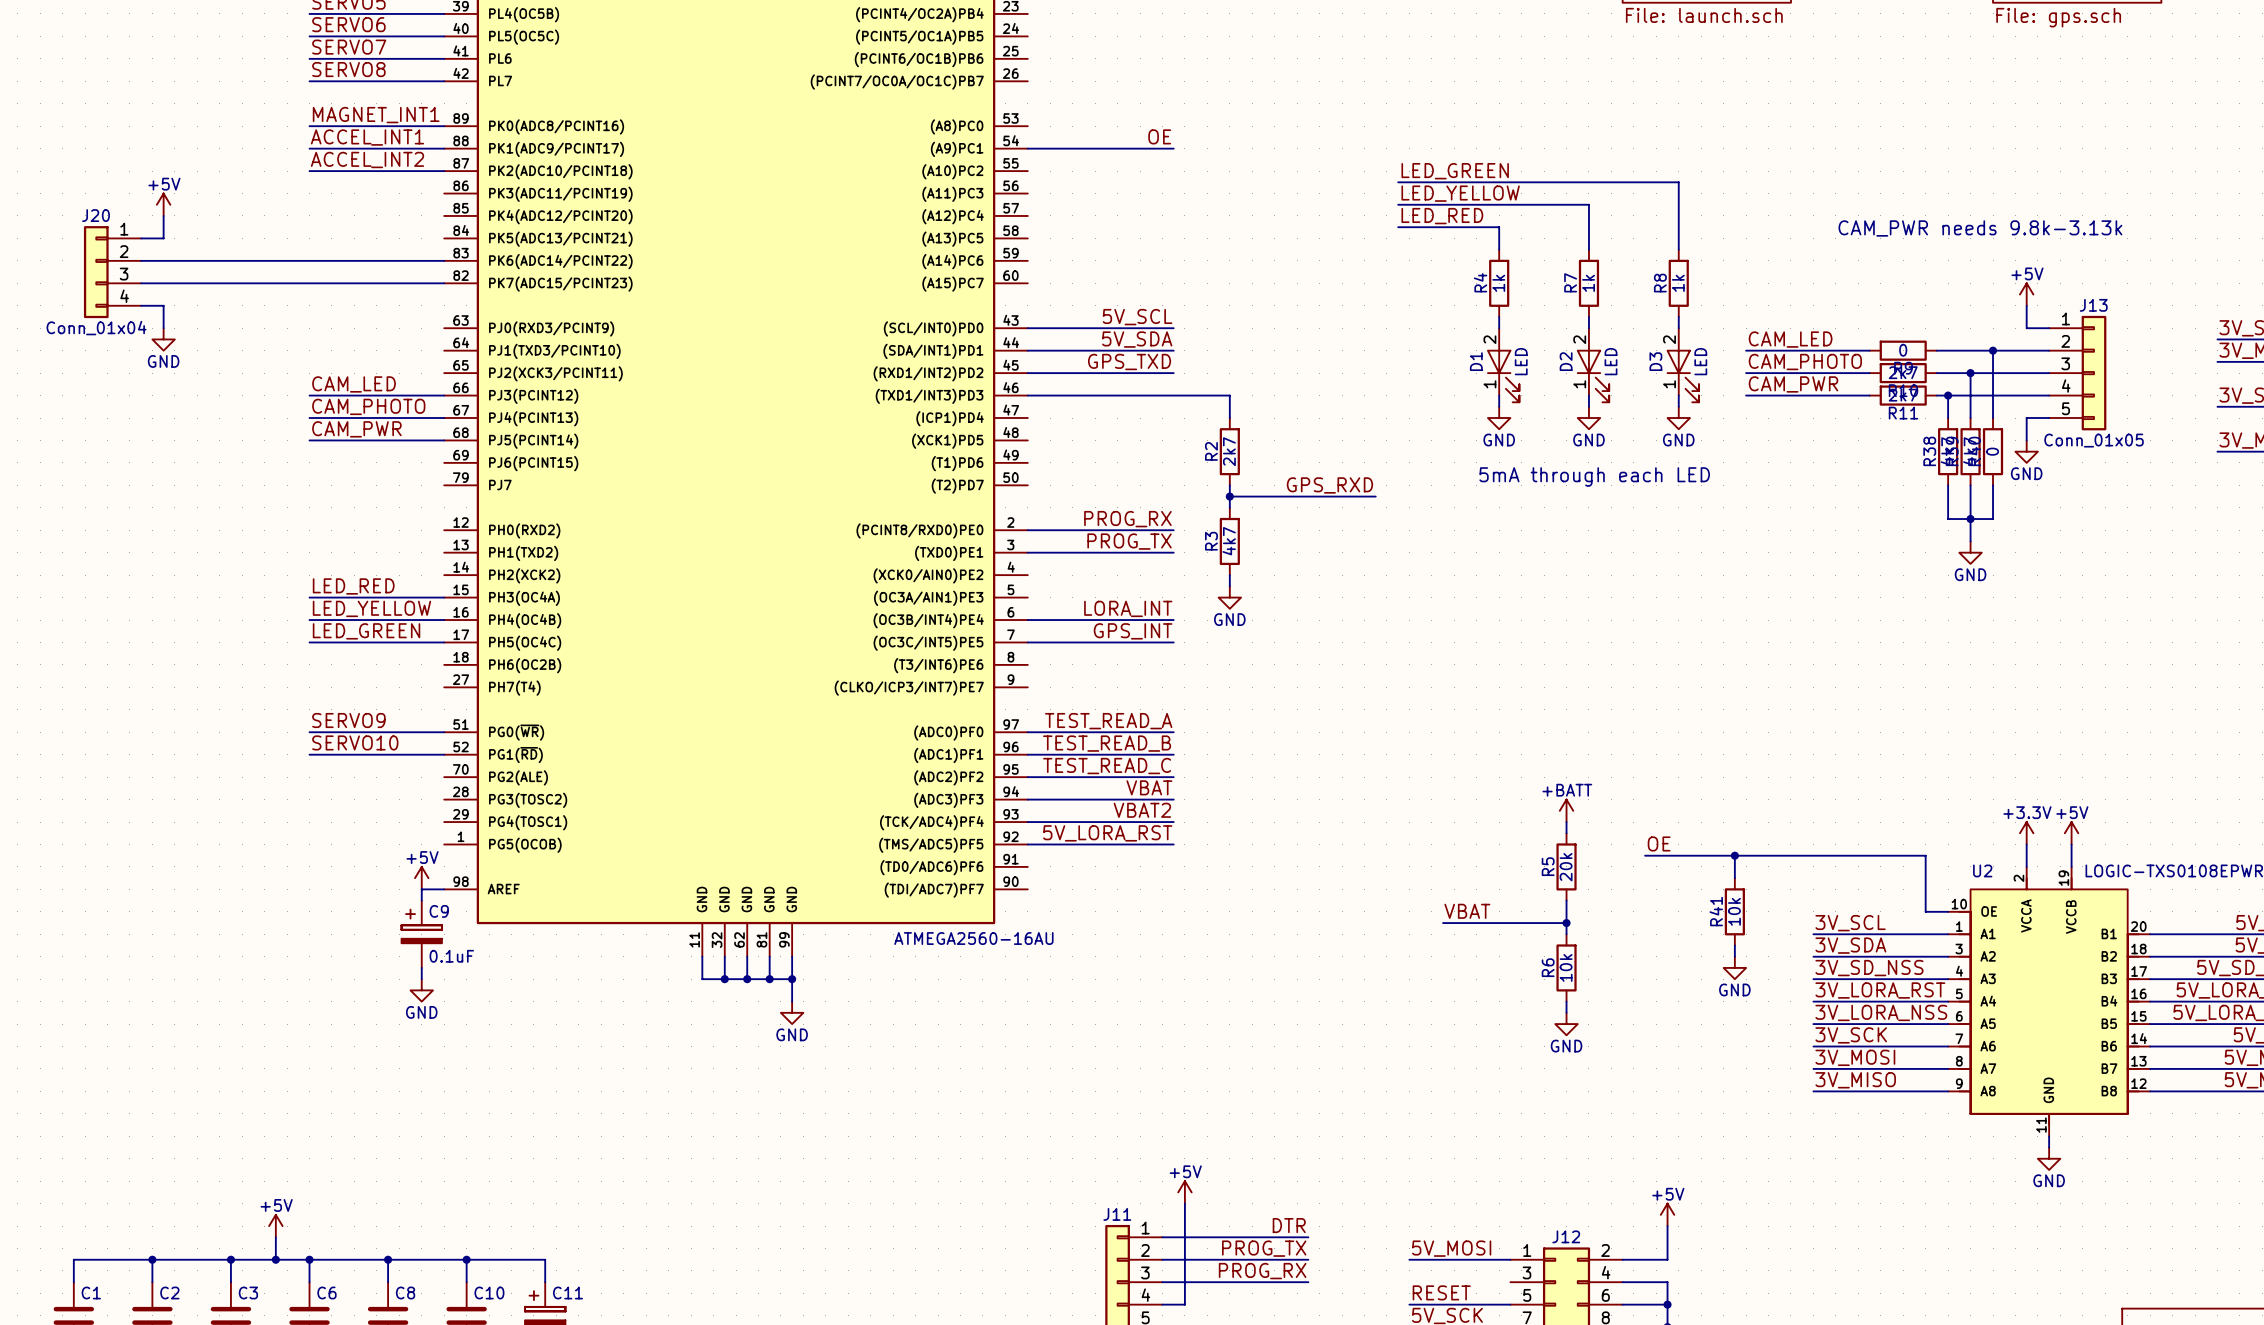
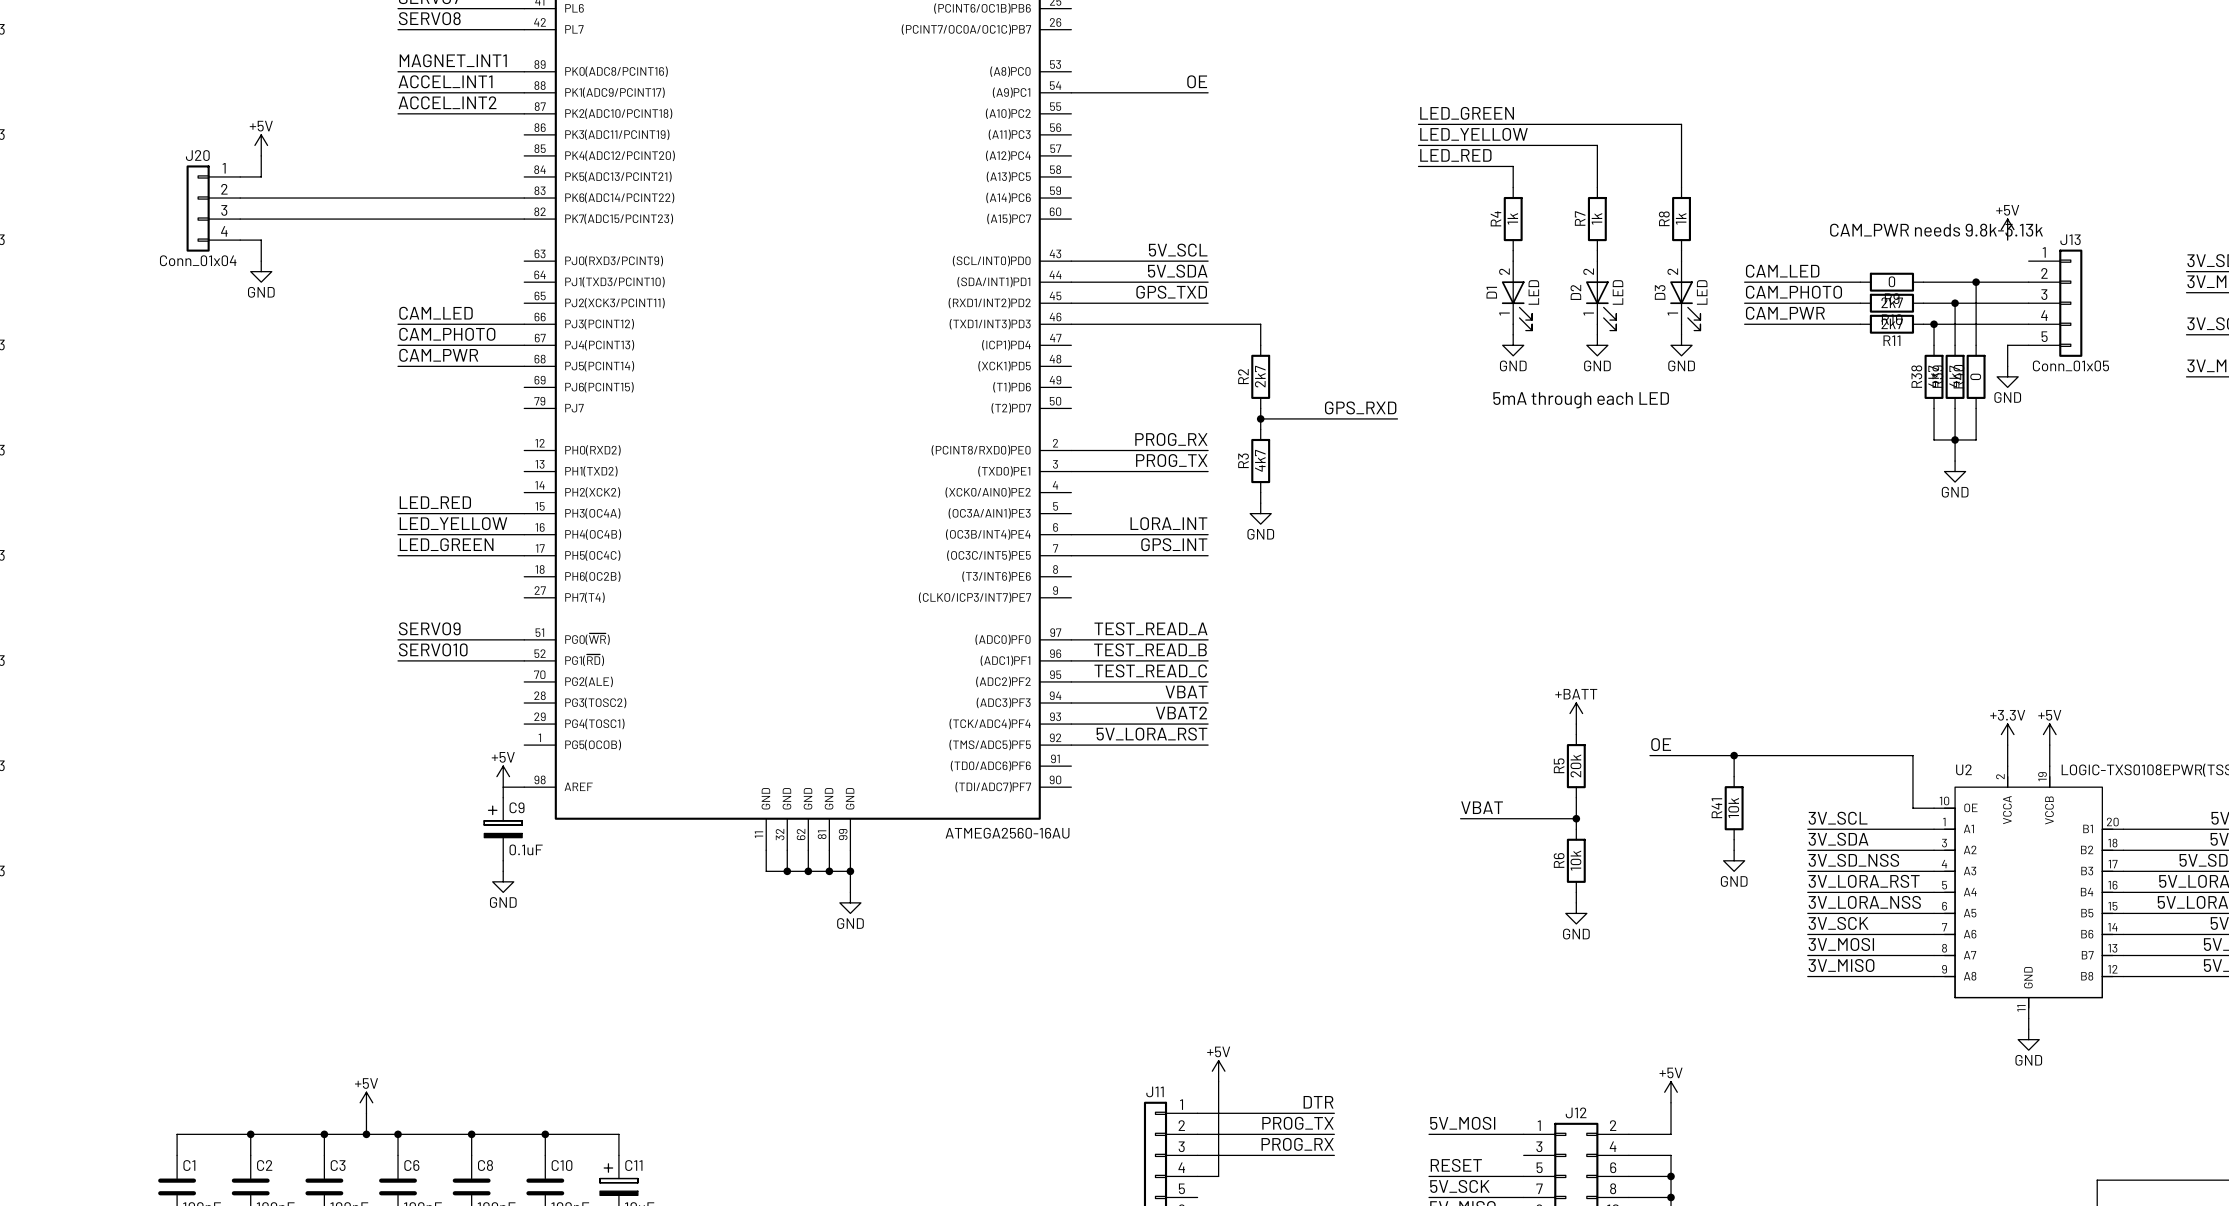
text position: CAM_PWR needs 9.8k-3.13k (1980, 228) -> CAM_PWR needs 9.8k-3.13k (1936, 230)
wire: (2026, 305) (2026, 328) (2049, 328) -> none

